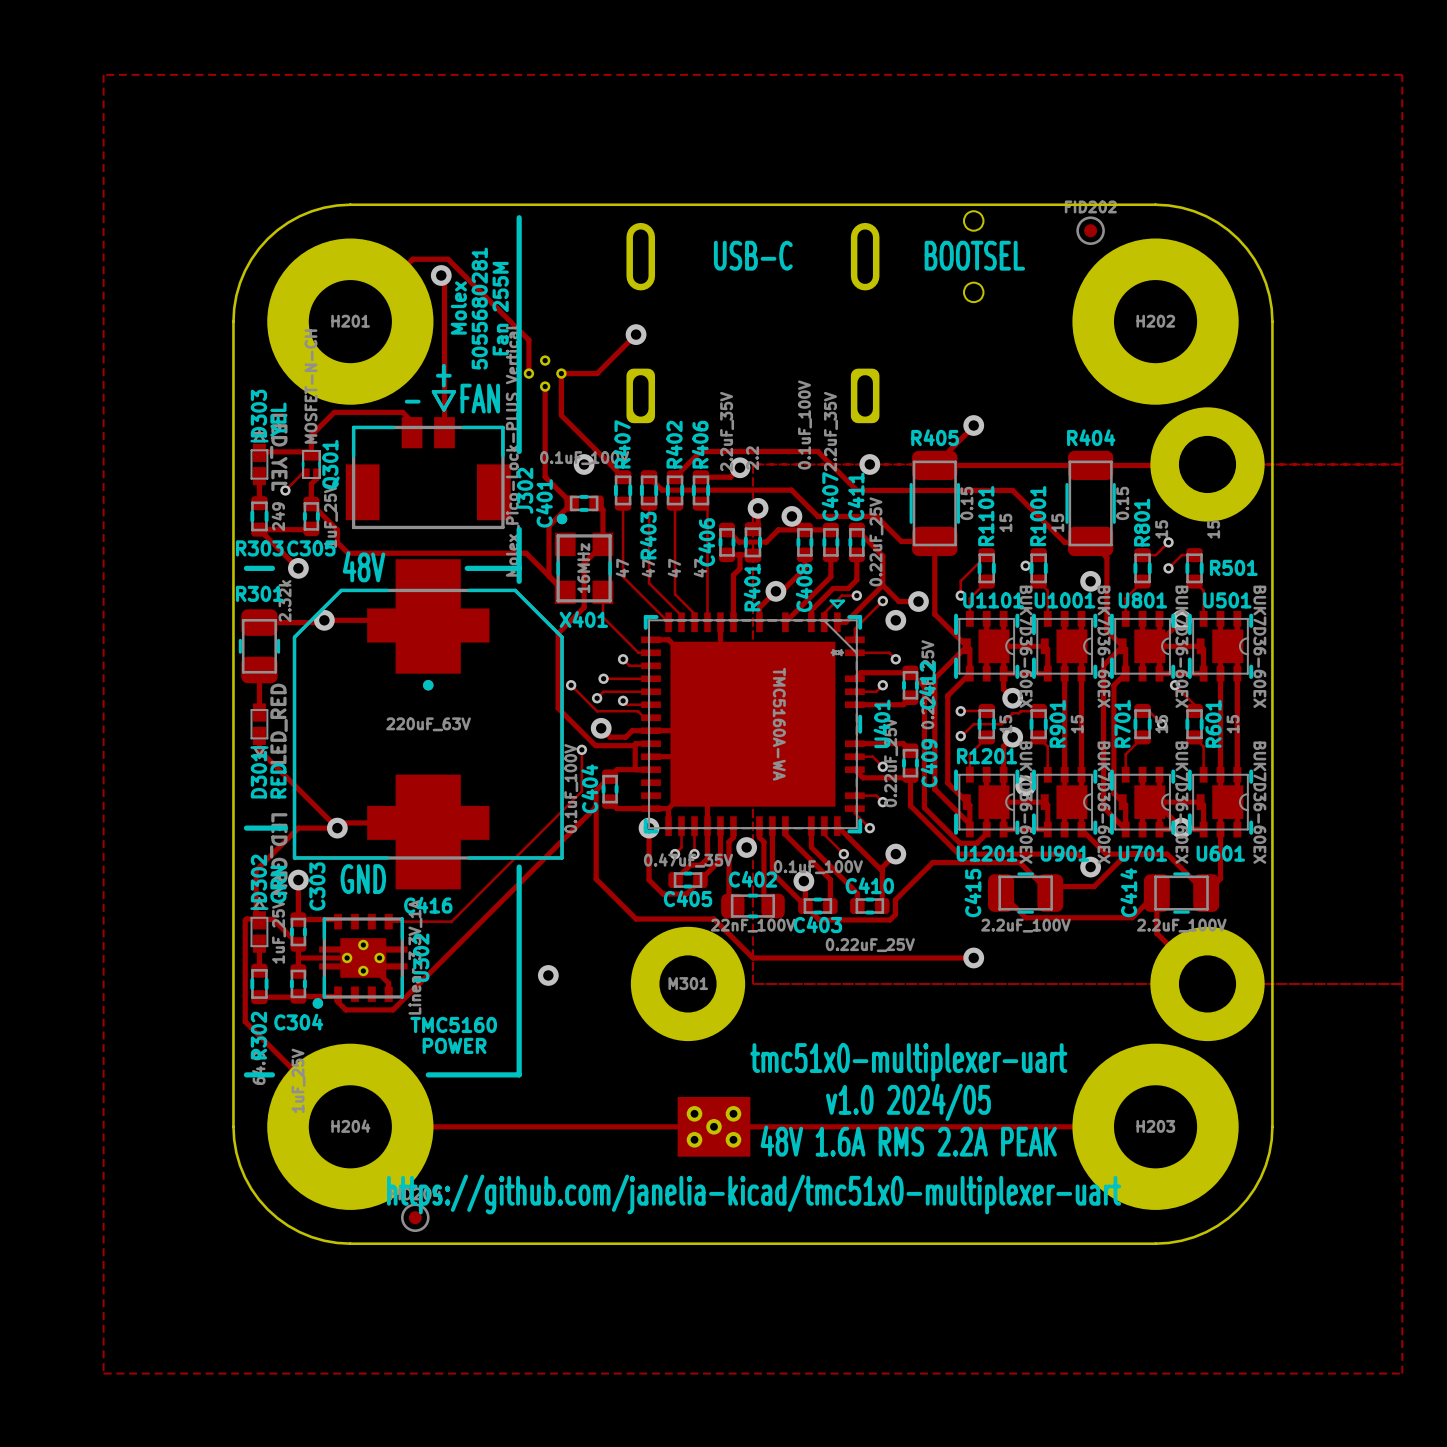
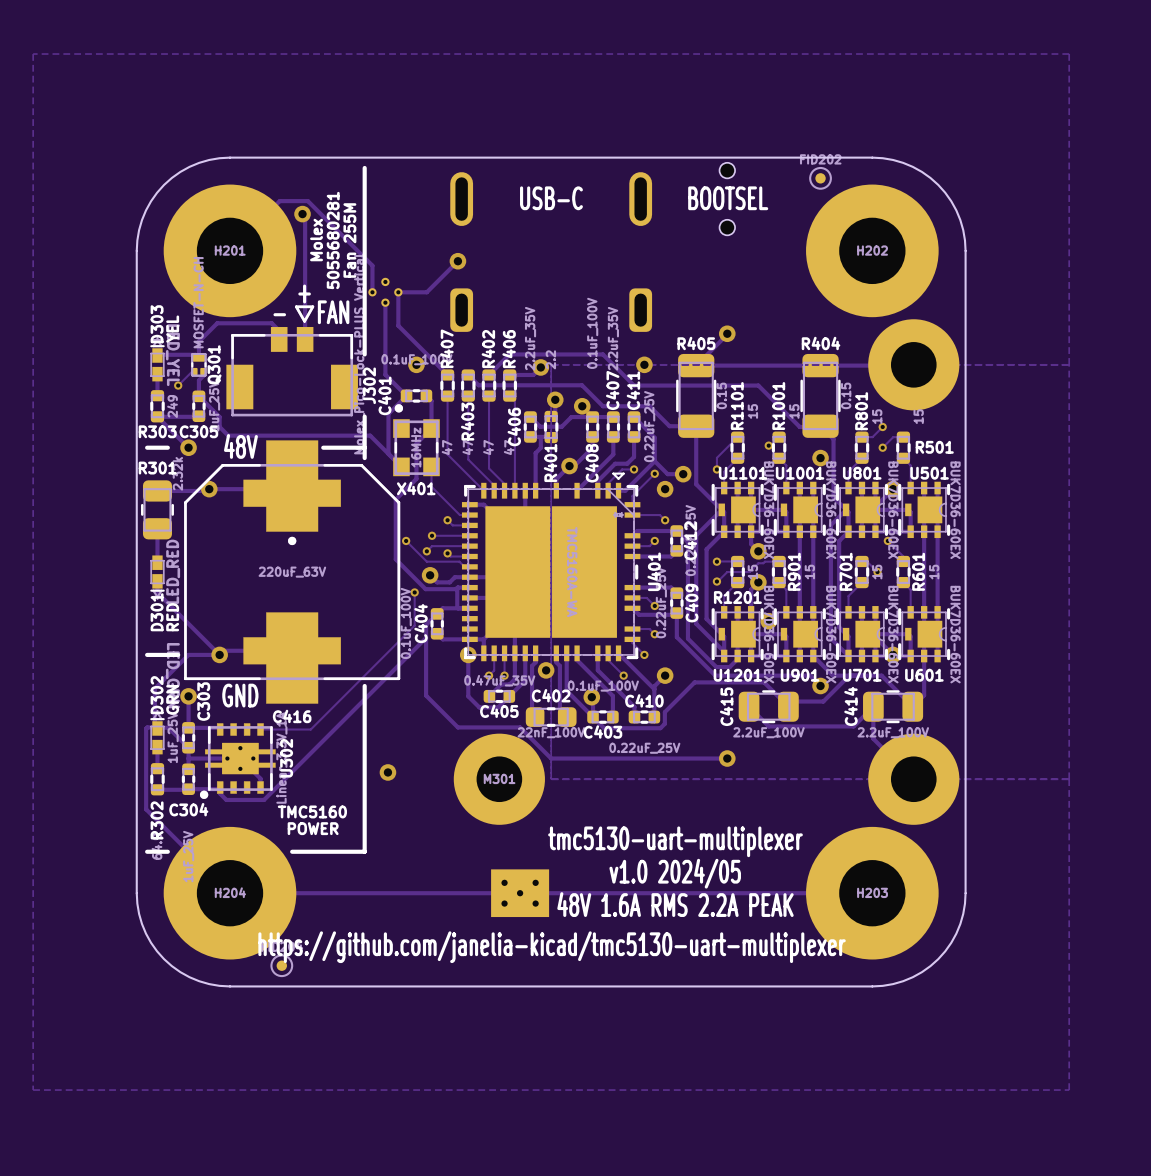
text: tmc51x0-multiplexer-uart (908, 1062) -> tmc5130-uart-multiplexer (675, 841)
text: https://github.com/janelia-kicad/tmc51x0-multiplexer-uart (754, 1194) -> https://github.com/janelia-kicad/tmc5130-uart-multiplexer (552, 947)

